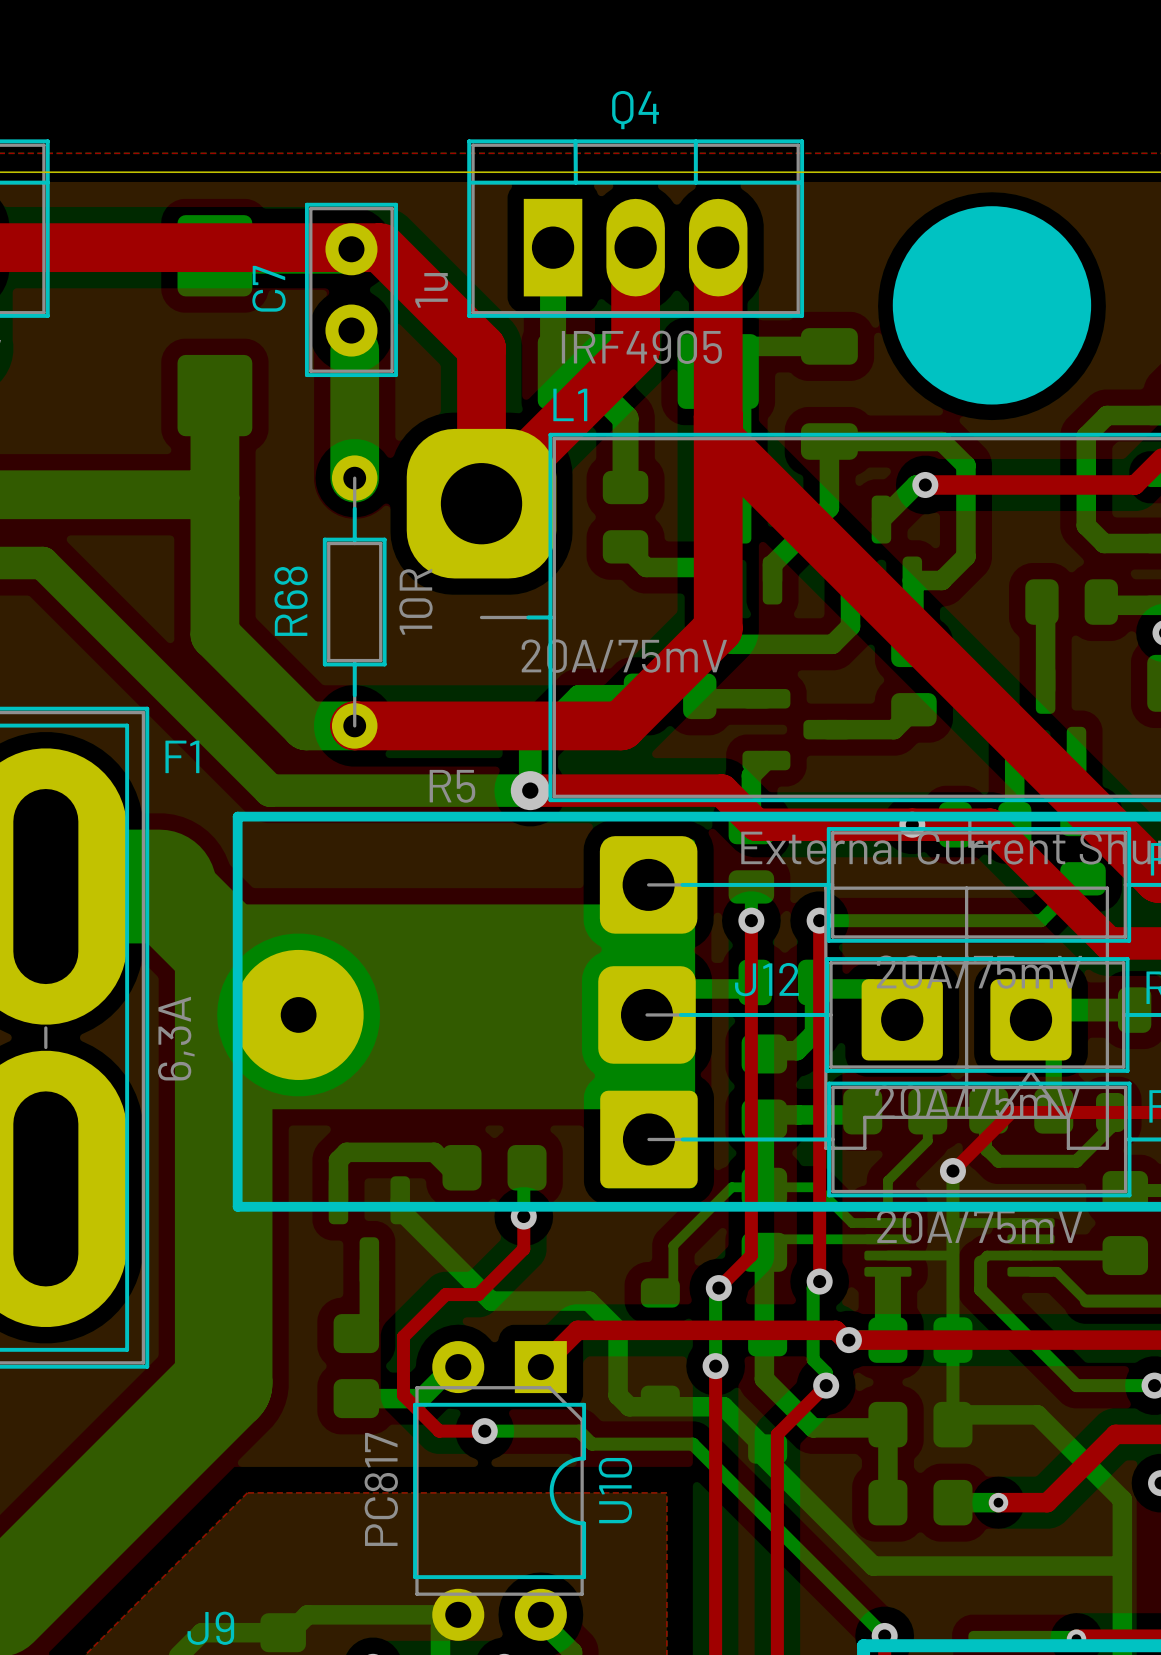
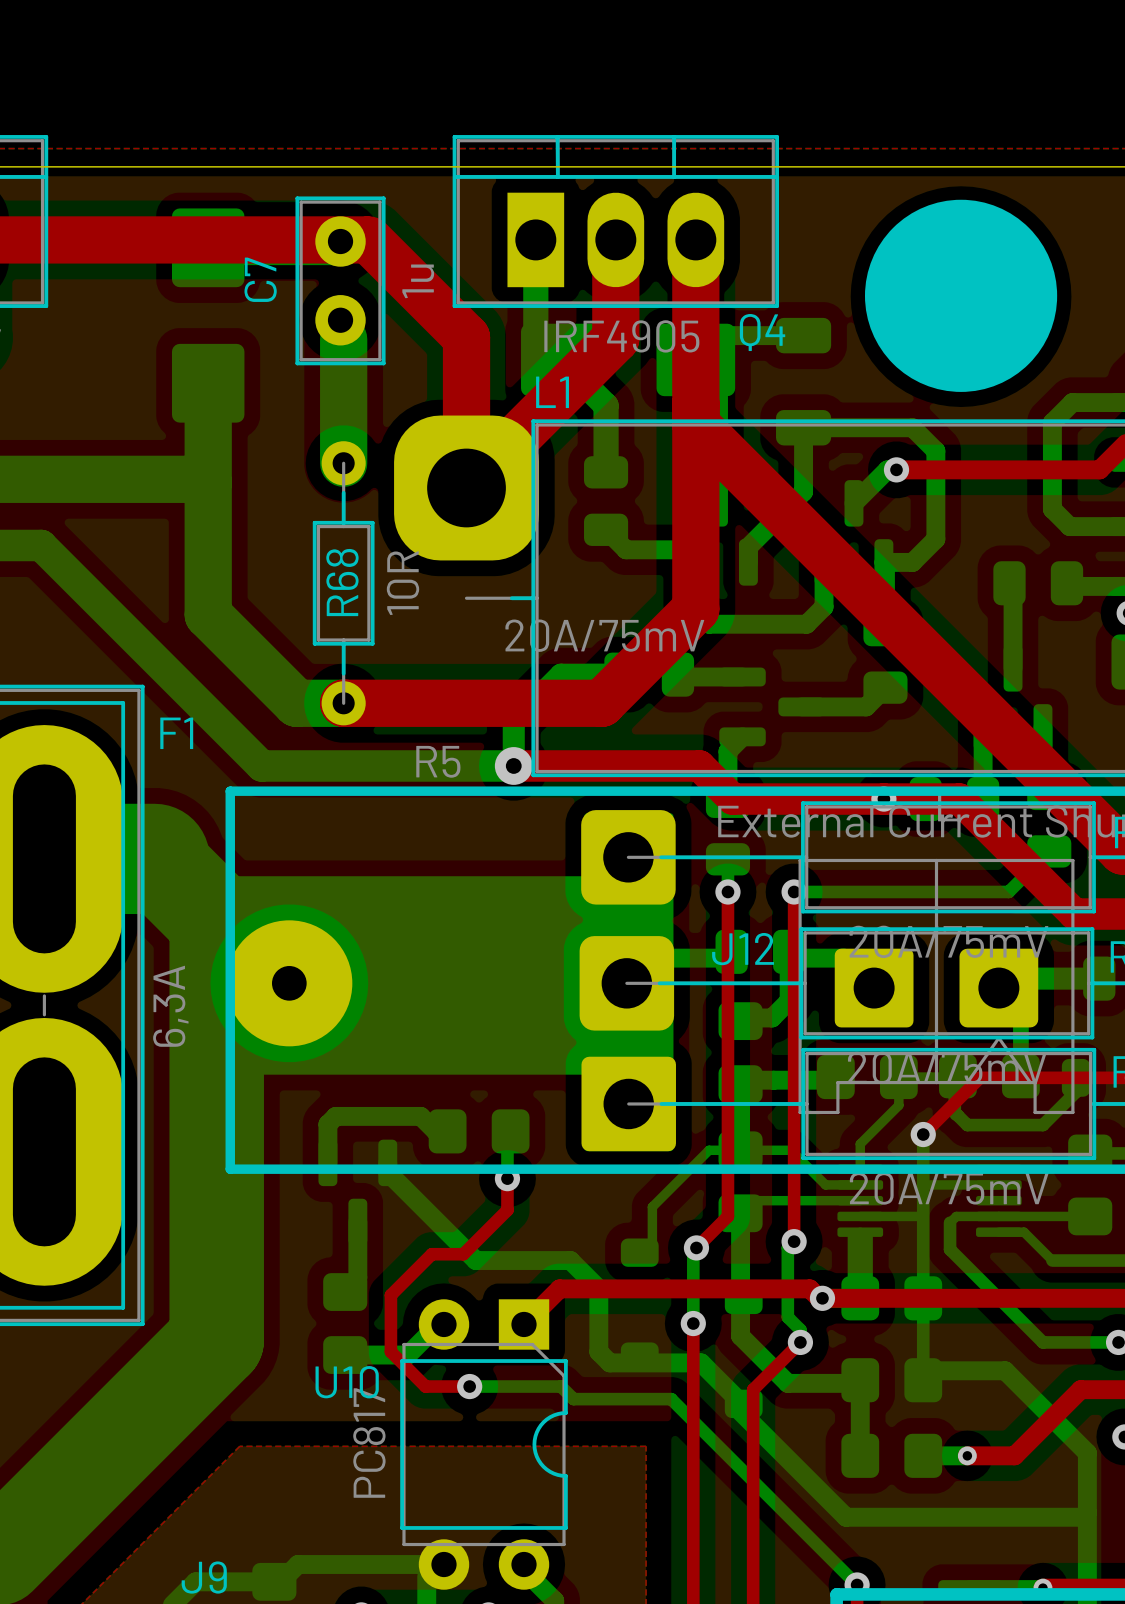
Q4 name position: Q4 (635, 110) -> Q4 (762, 332)
R68 name position: R68 (291, 601) -> R68 (342, 582)
U10 name rotation: 0° (615, 1490) -> 90° clockwise (347, 1382)
U10 name position: U10 (615, 1490) -> U10 (347, 1382)

